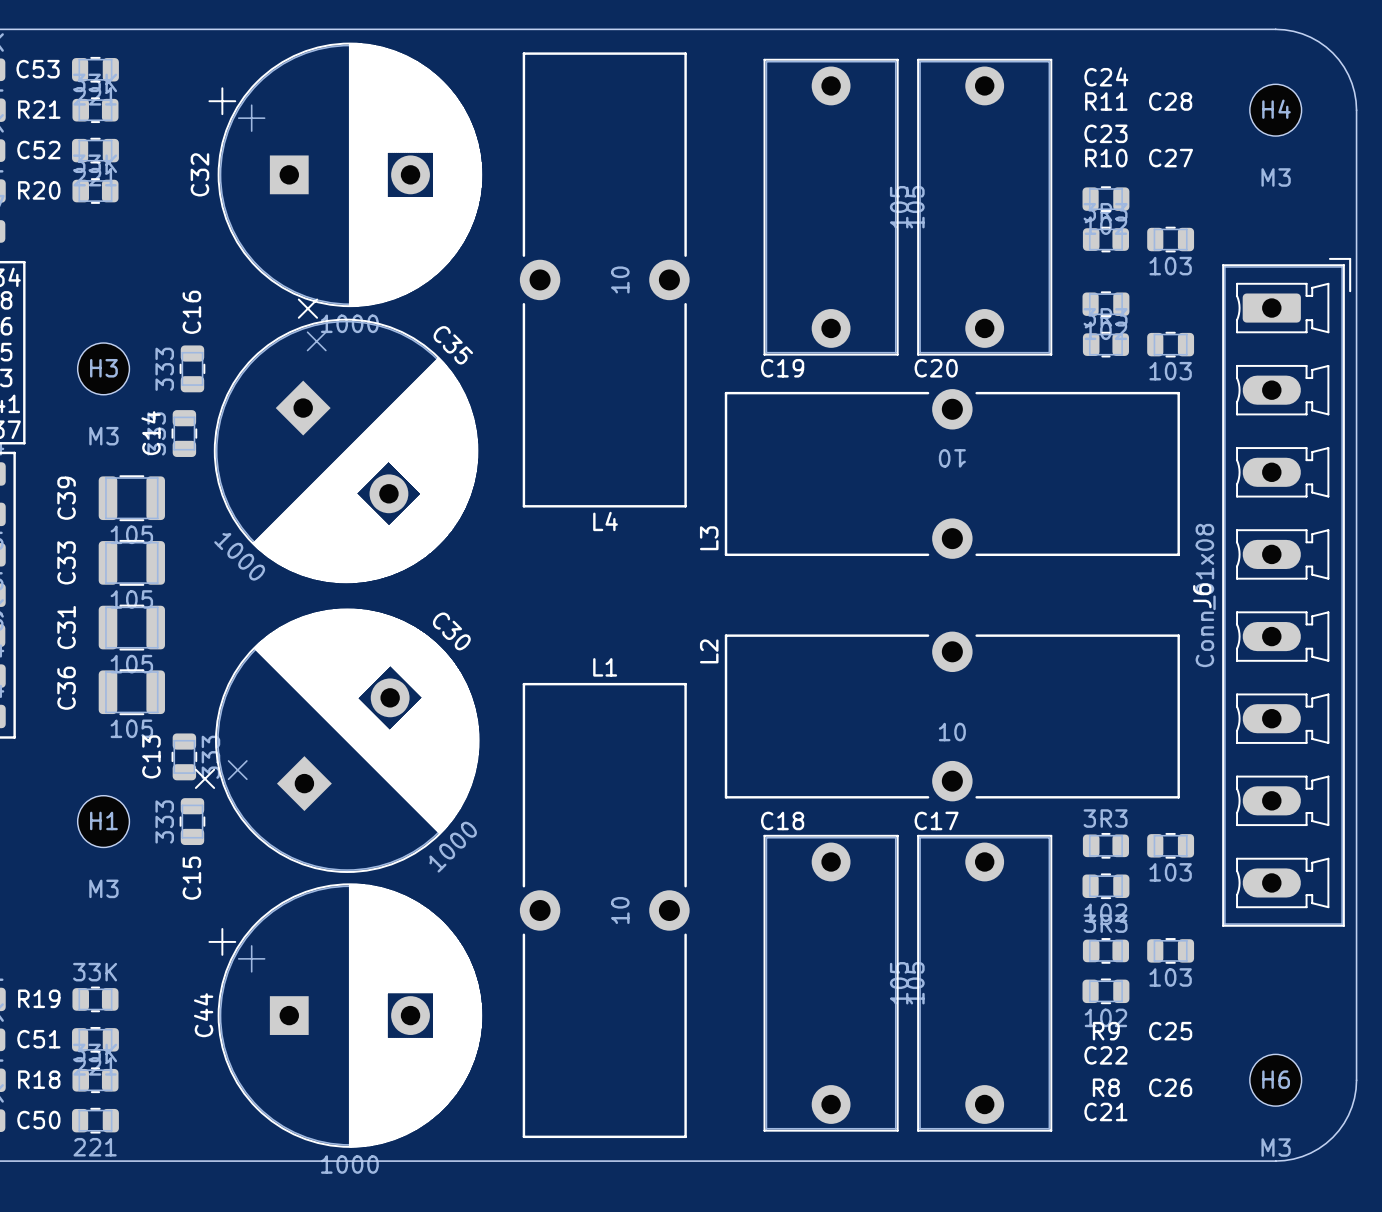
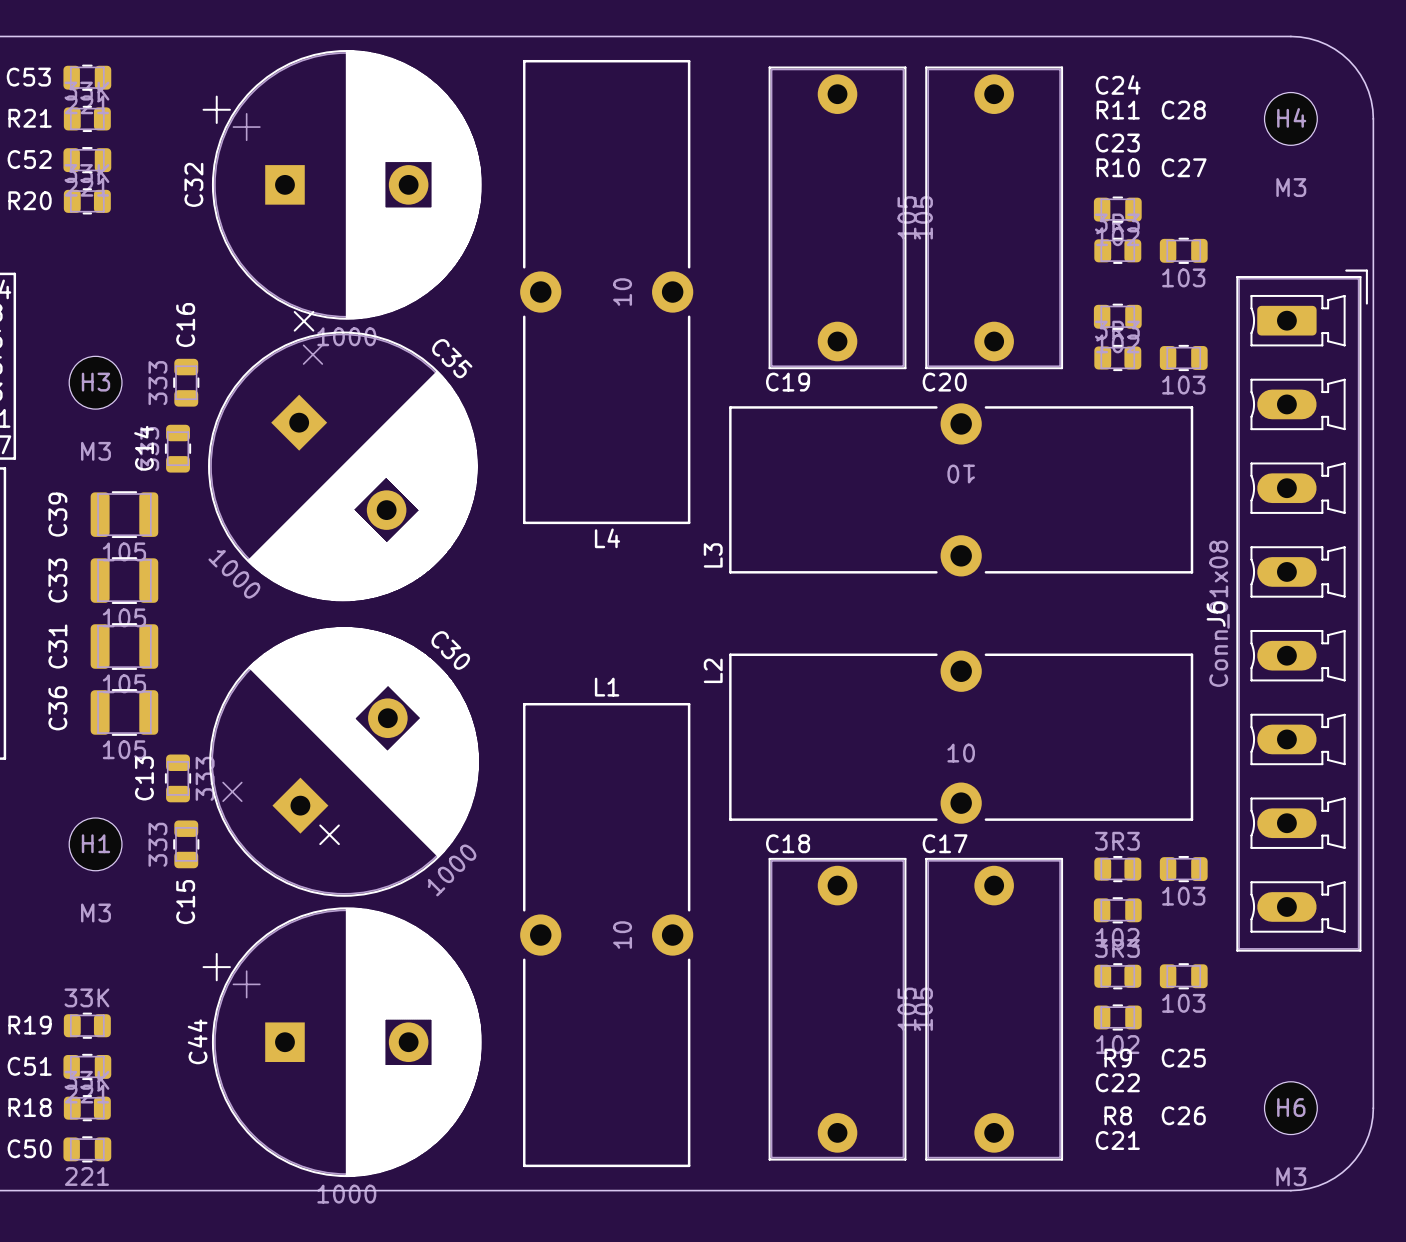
C30 footprint: [194, 608, 480, 873] -> [209, 627, 480, 897]

